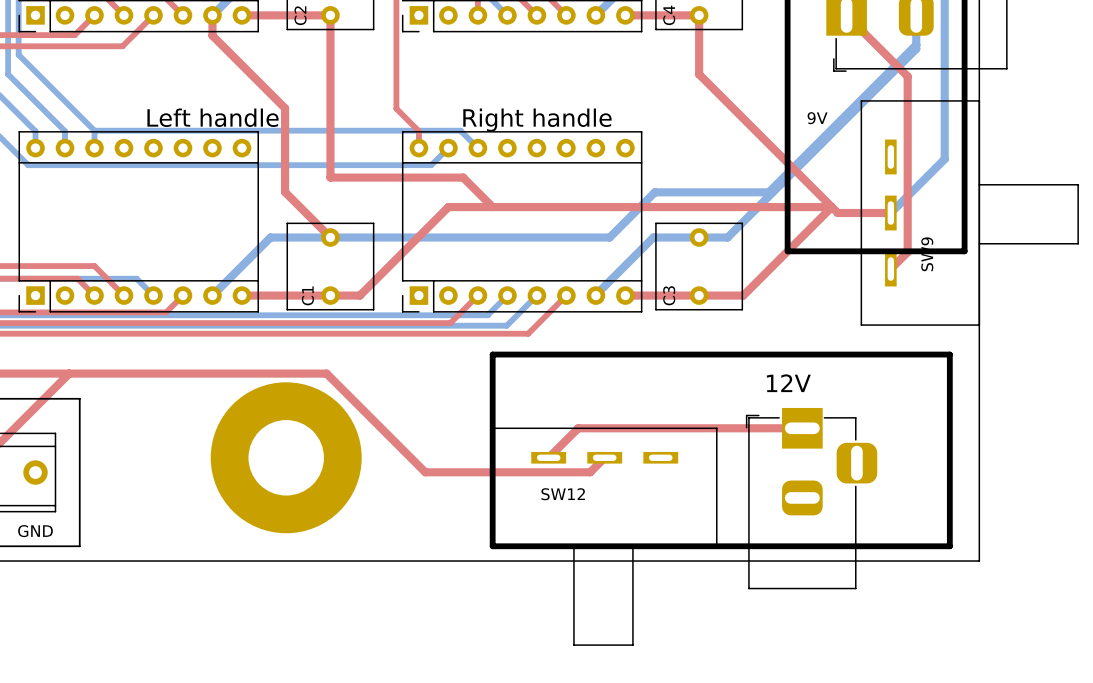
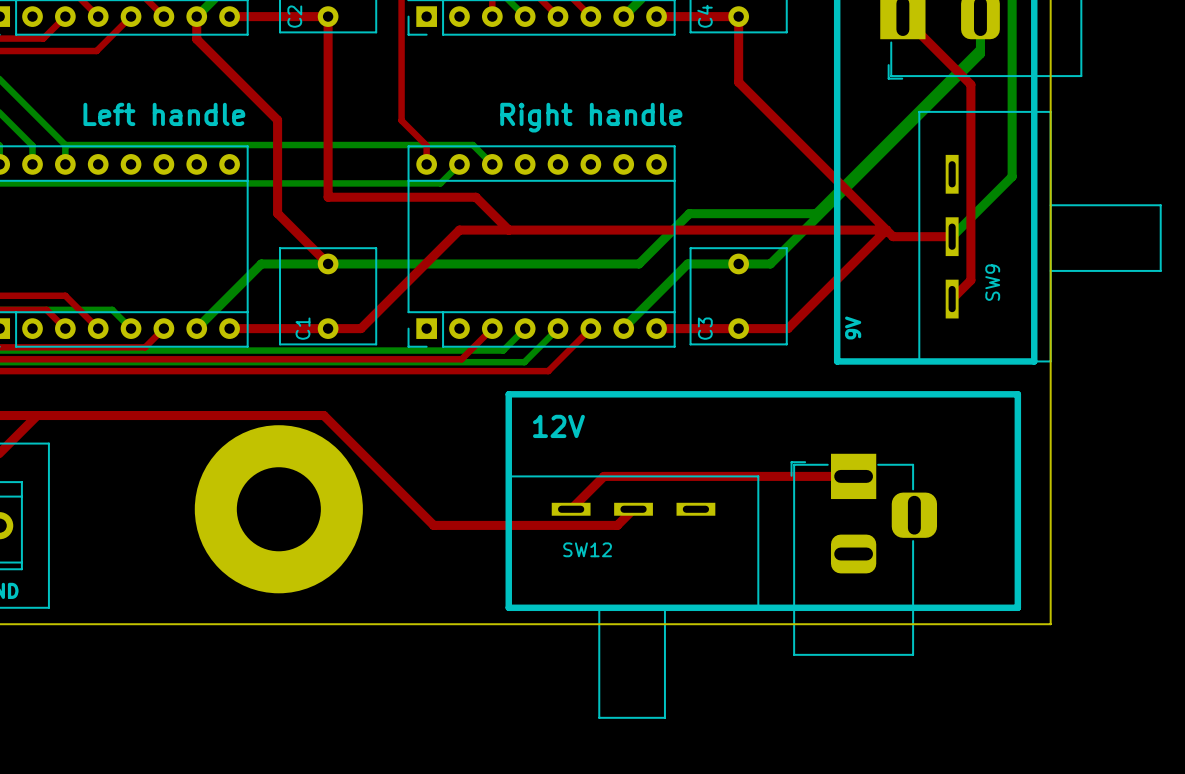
text position: Left handle (213, 117) -> Left handle (164, 114)
text rotation: 0° (817, 118) -> 90° counterclockwise (853, 328)
text position: 9V (817, 118) -> 9V (853, 328)
text position: Right handle (537, 120) -> Right handle (591, 117)
line: (787, 251) (964, 251) -> (837, 279) (837, 361) (1034, 361) (1034, 279)
text position: 12V (788, 383) -> 12V (558, 426)

